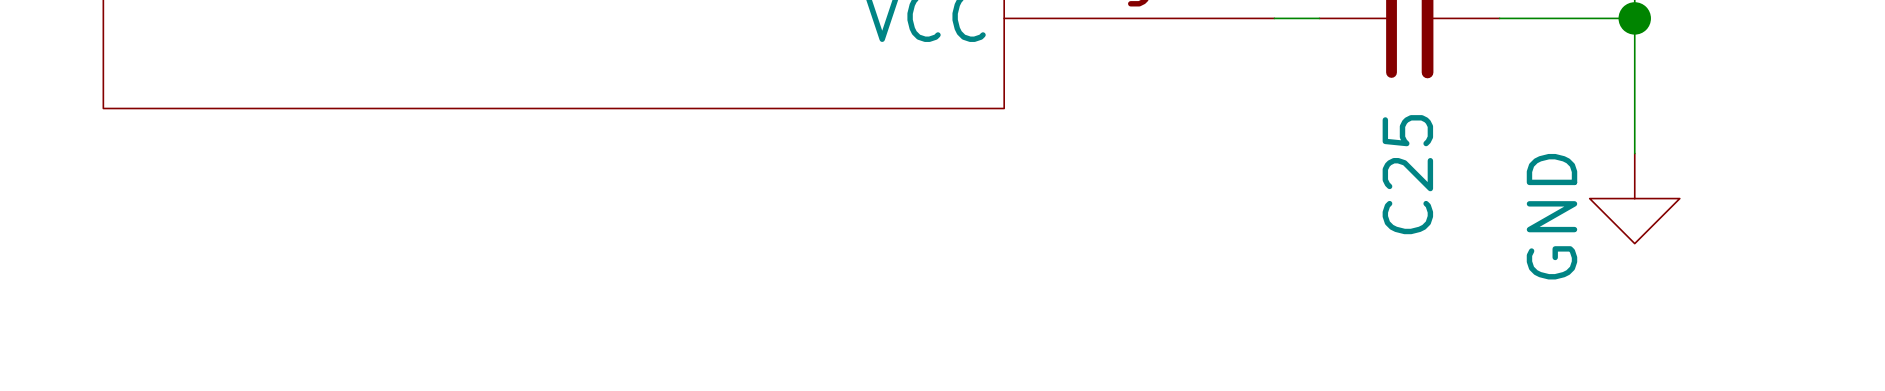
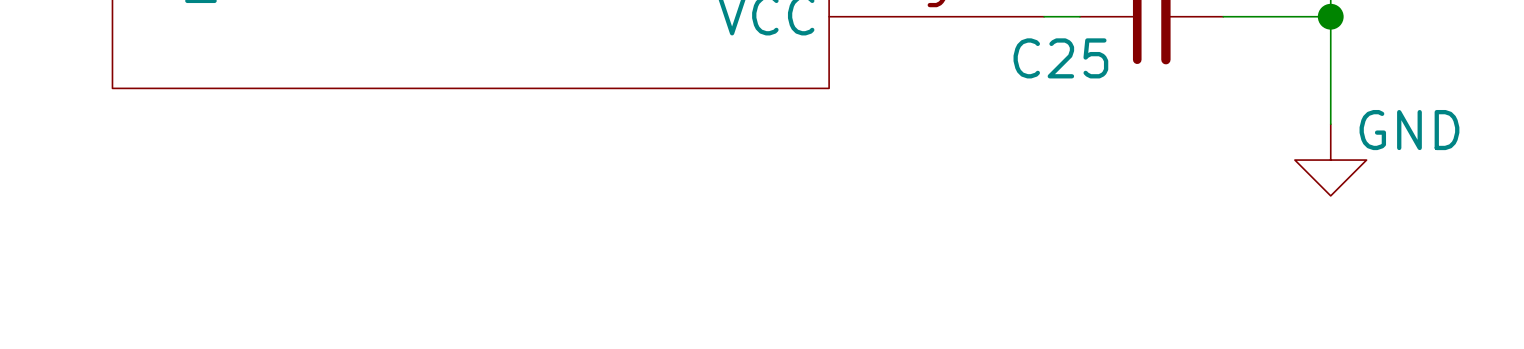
C25 name rotation: 0° (1407, 174) -> 90° clockwise (1060, 58)
power symbol text rotation: 0° (1551, 216) -> 90° clockwise (1409, 130)
power symbol text position: GND (1551, 216) -> GND (1409, 130)

